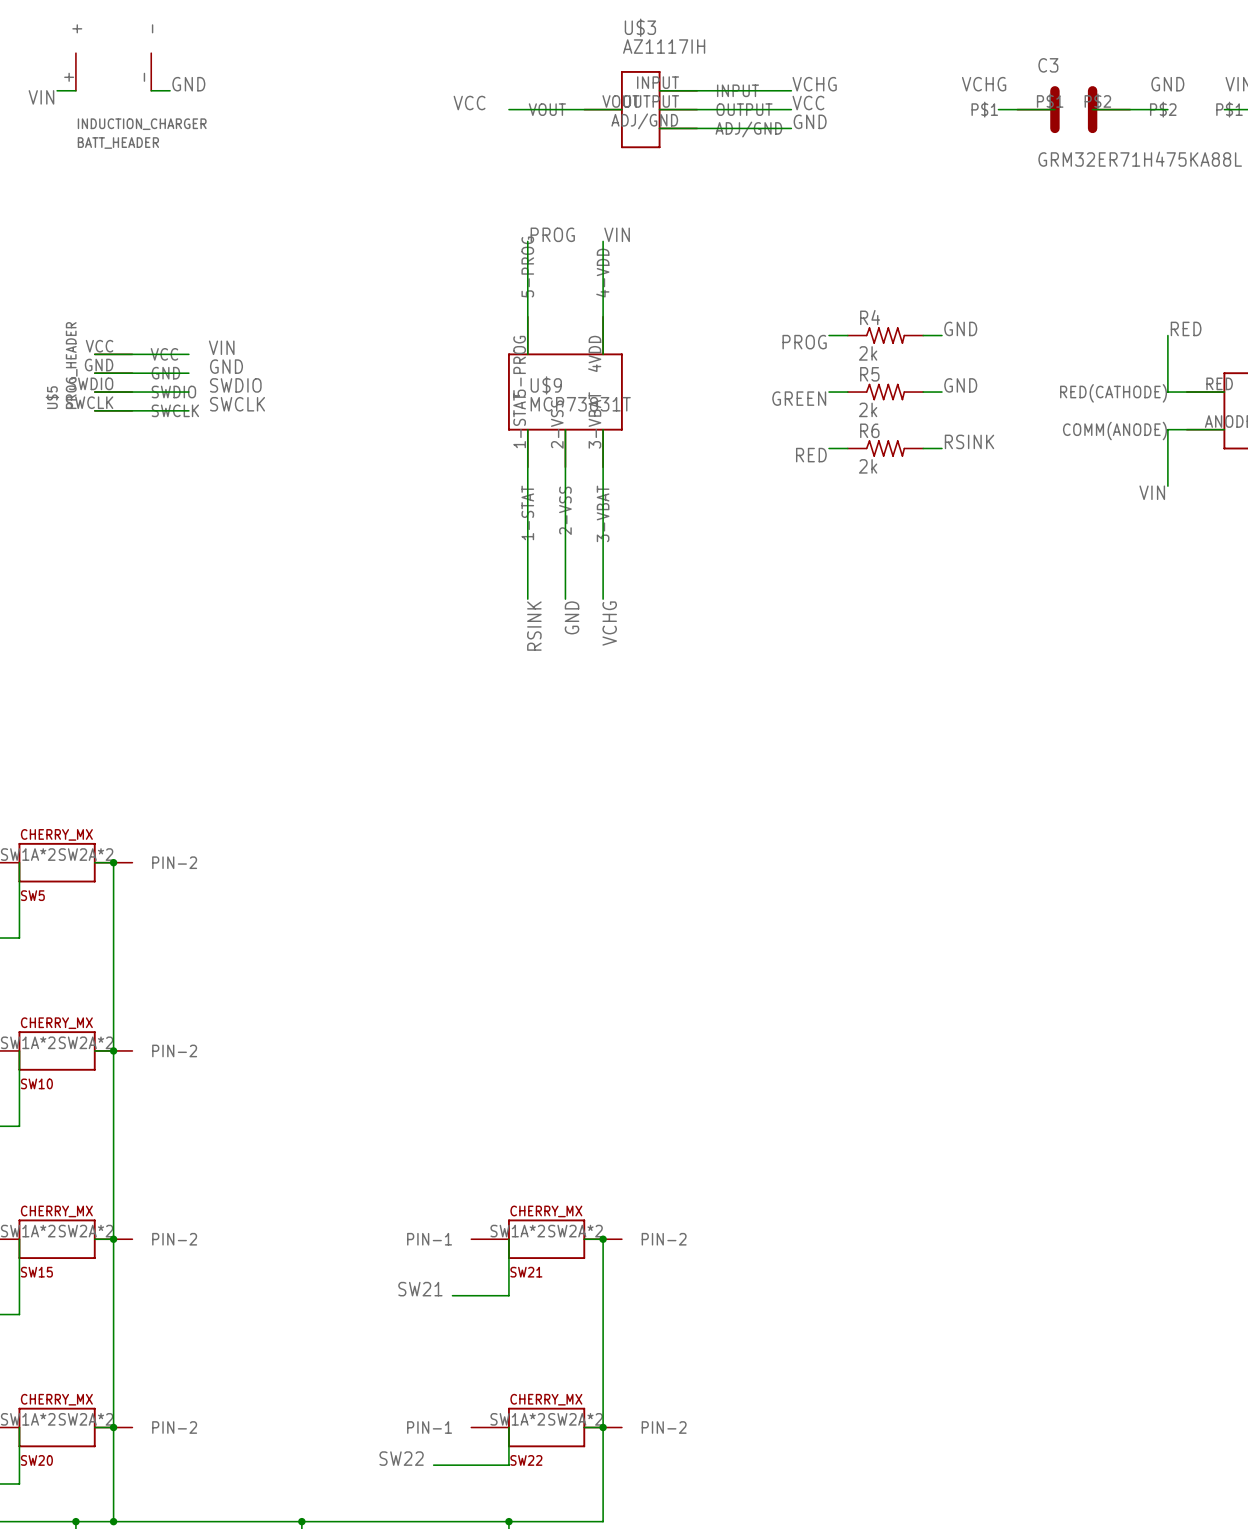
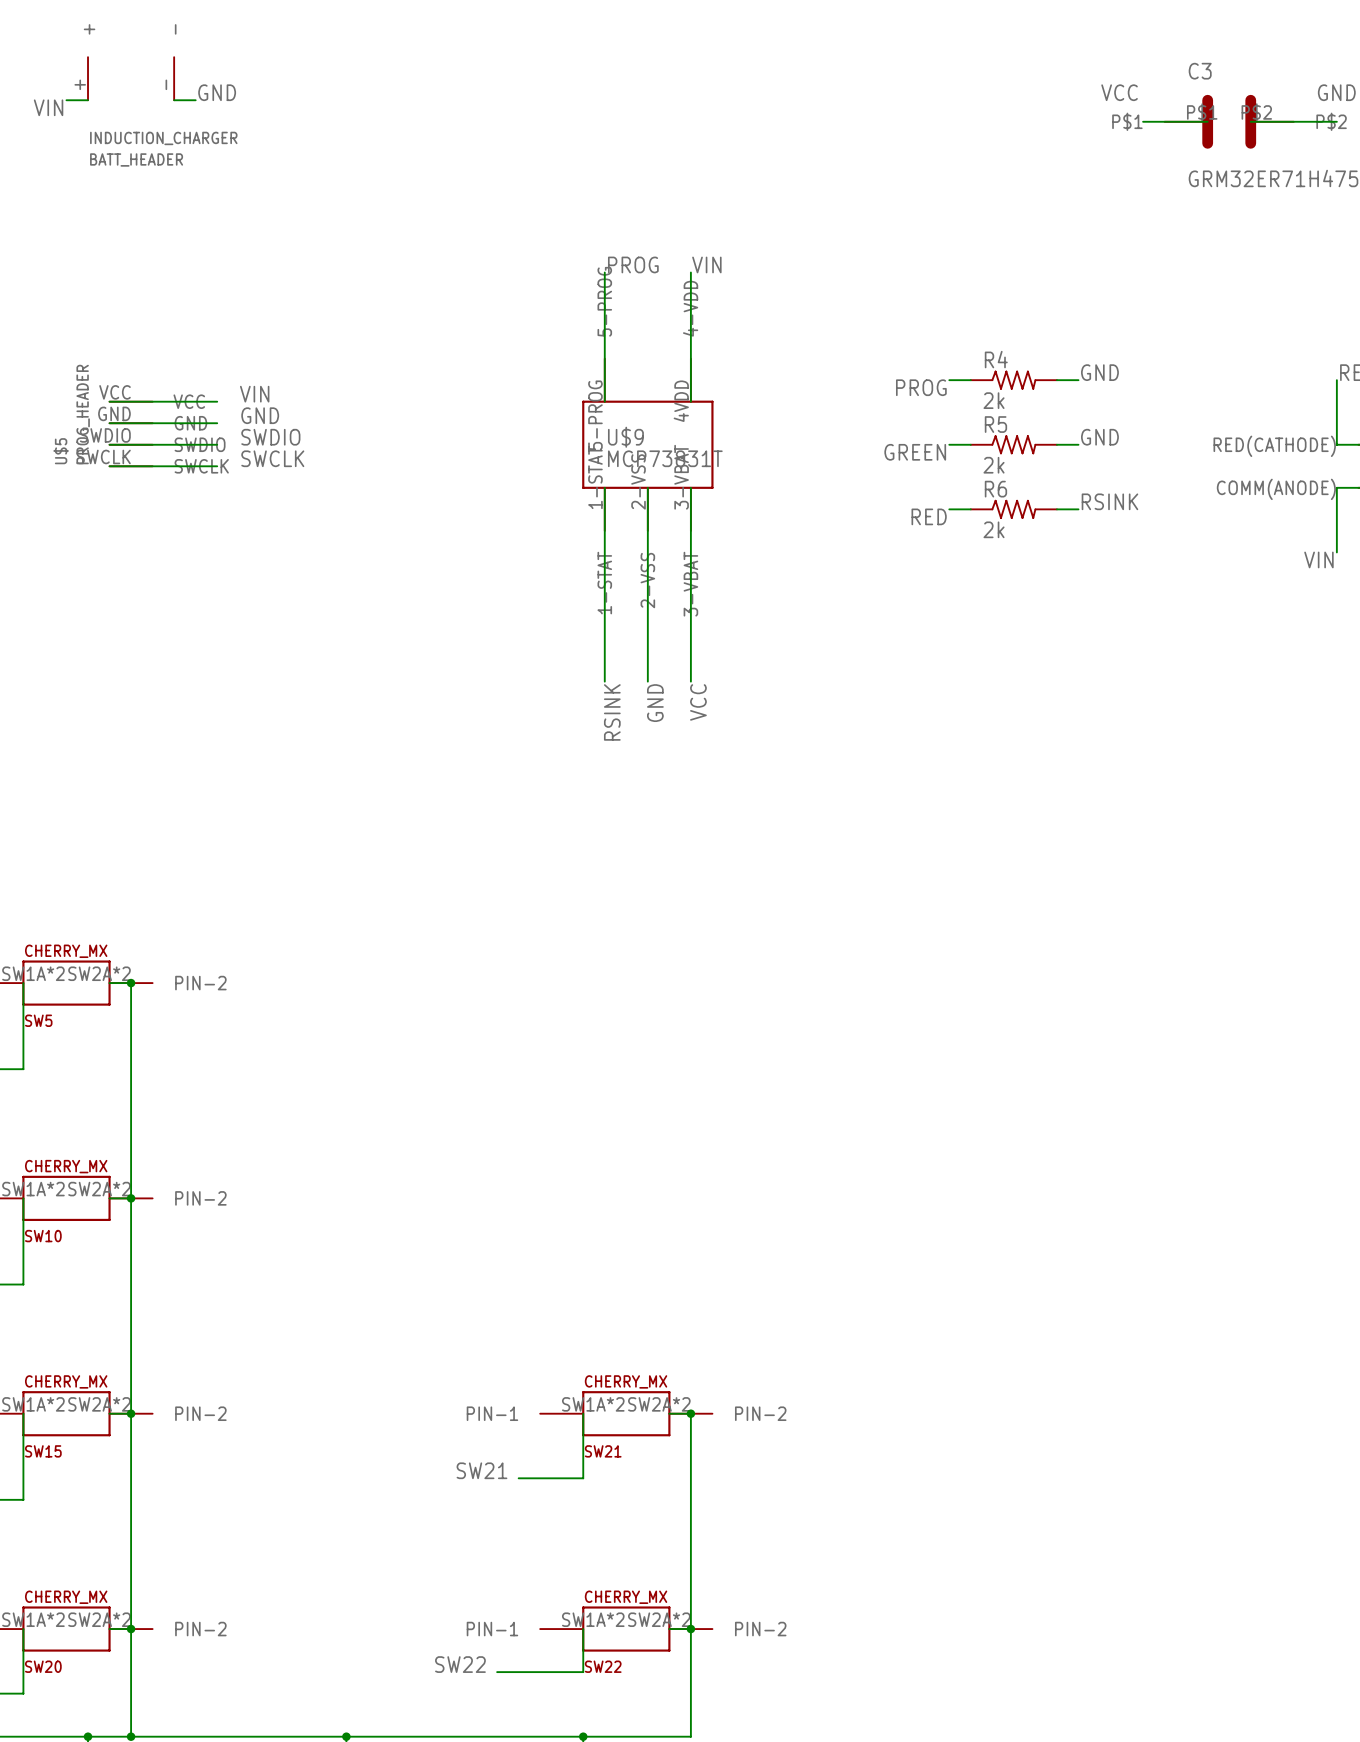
label: VCHG (814, 84) -> none
label: VCHG (984, 84) -> VCC (1119, 92)
wire: (659, 90) (791, 90) -> none
label: VCC (469, 103) -> none
label: VCC (808, 103) -> none
wire: (508, 109) (621, 109) -> none
U$3: AZ1117IH (640, 109) -> none
wire: (659, 109) (791, 109) -> none
label: GND (810, 121) -> none
wire: (659, 128) (791, 128) -> none
label: VCHG (609, 623) -> VCC (698, 702)

